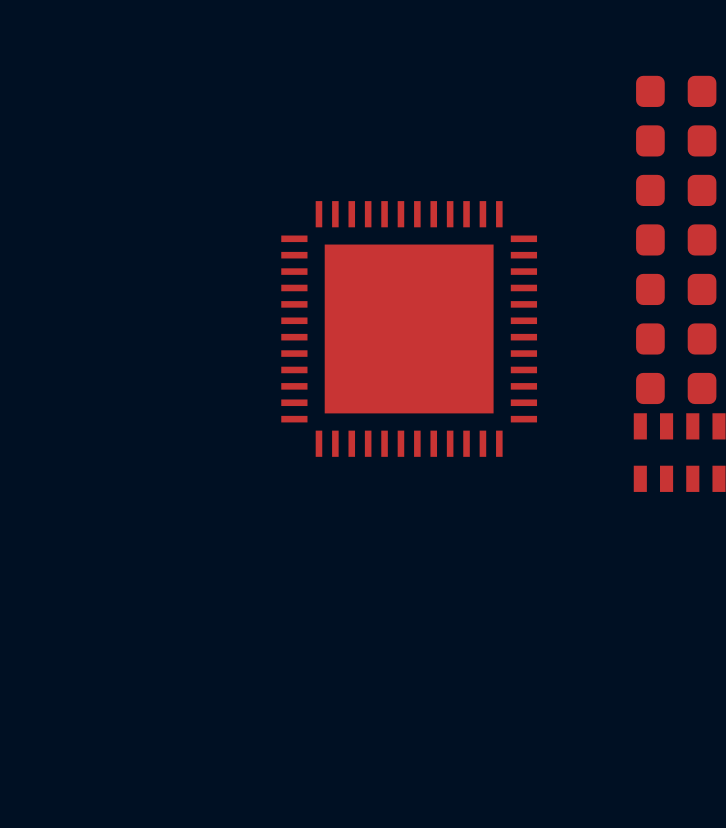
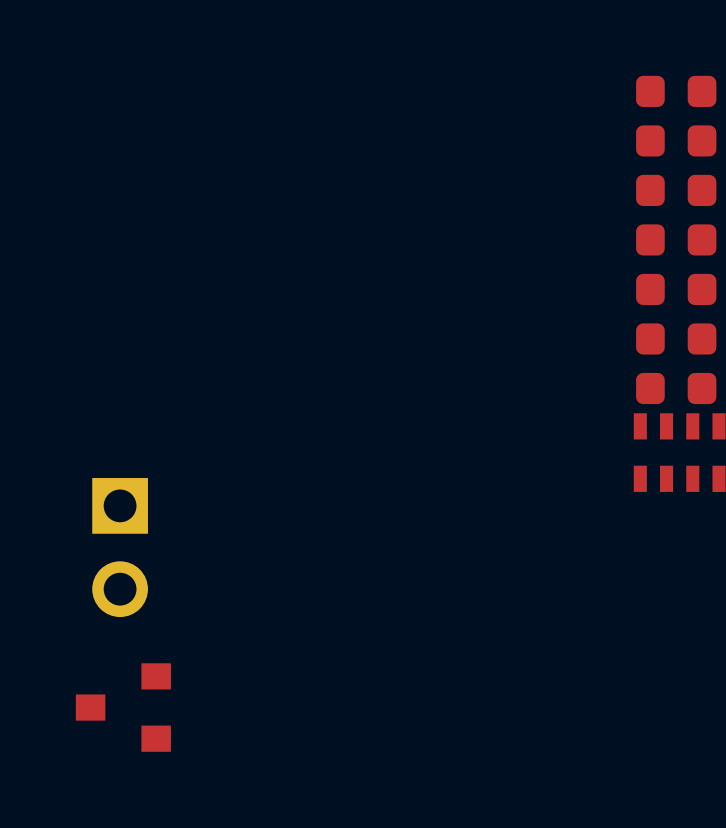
part: (409, 328) -> none
part: none -> (120, 547)
part: none -> (123, 707)

